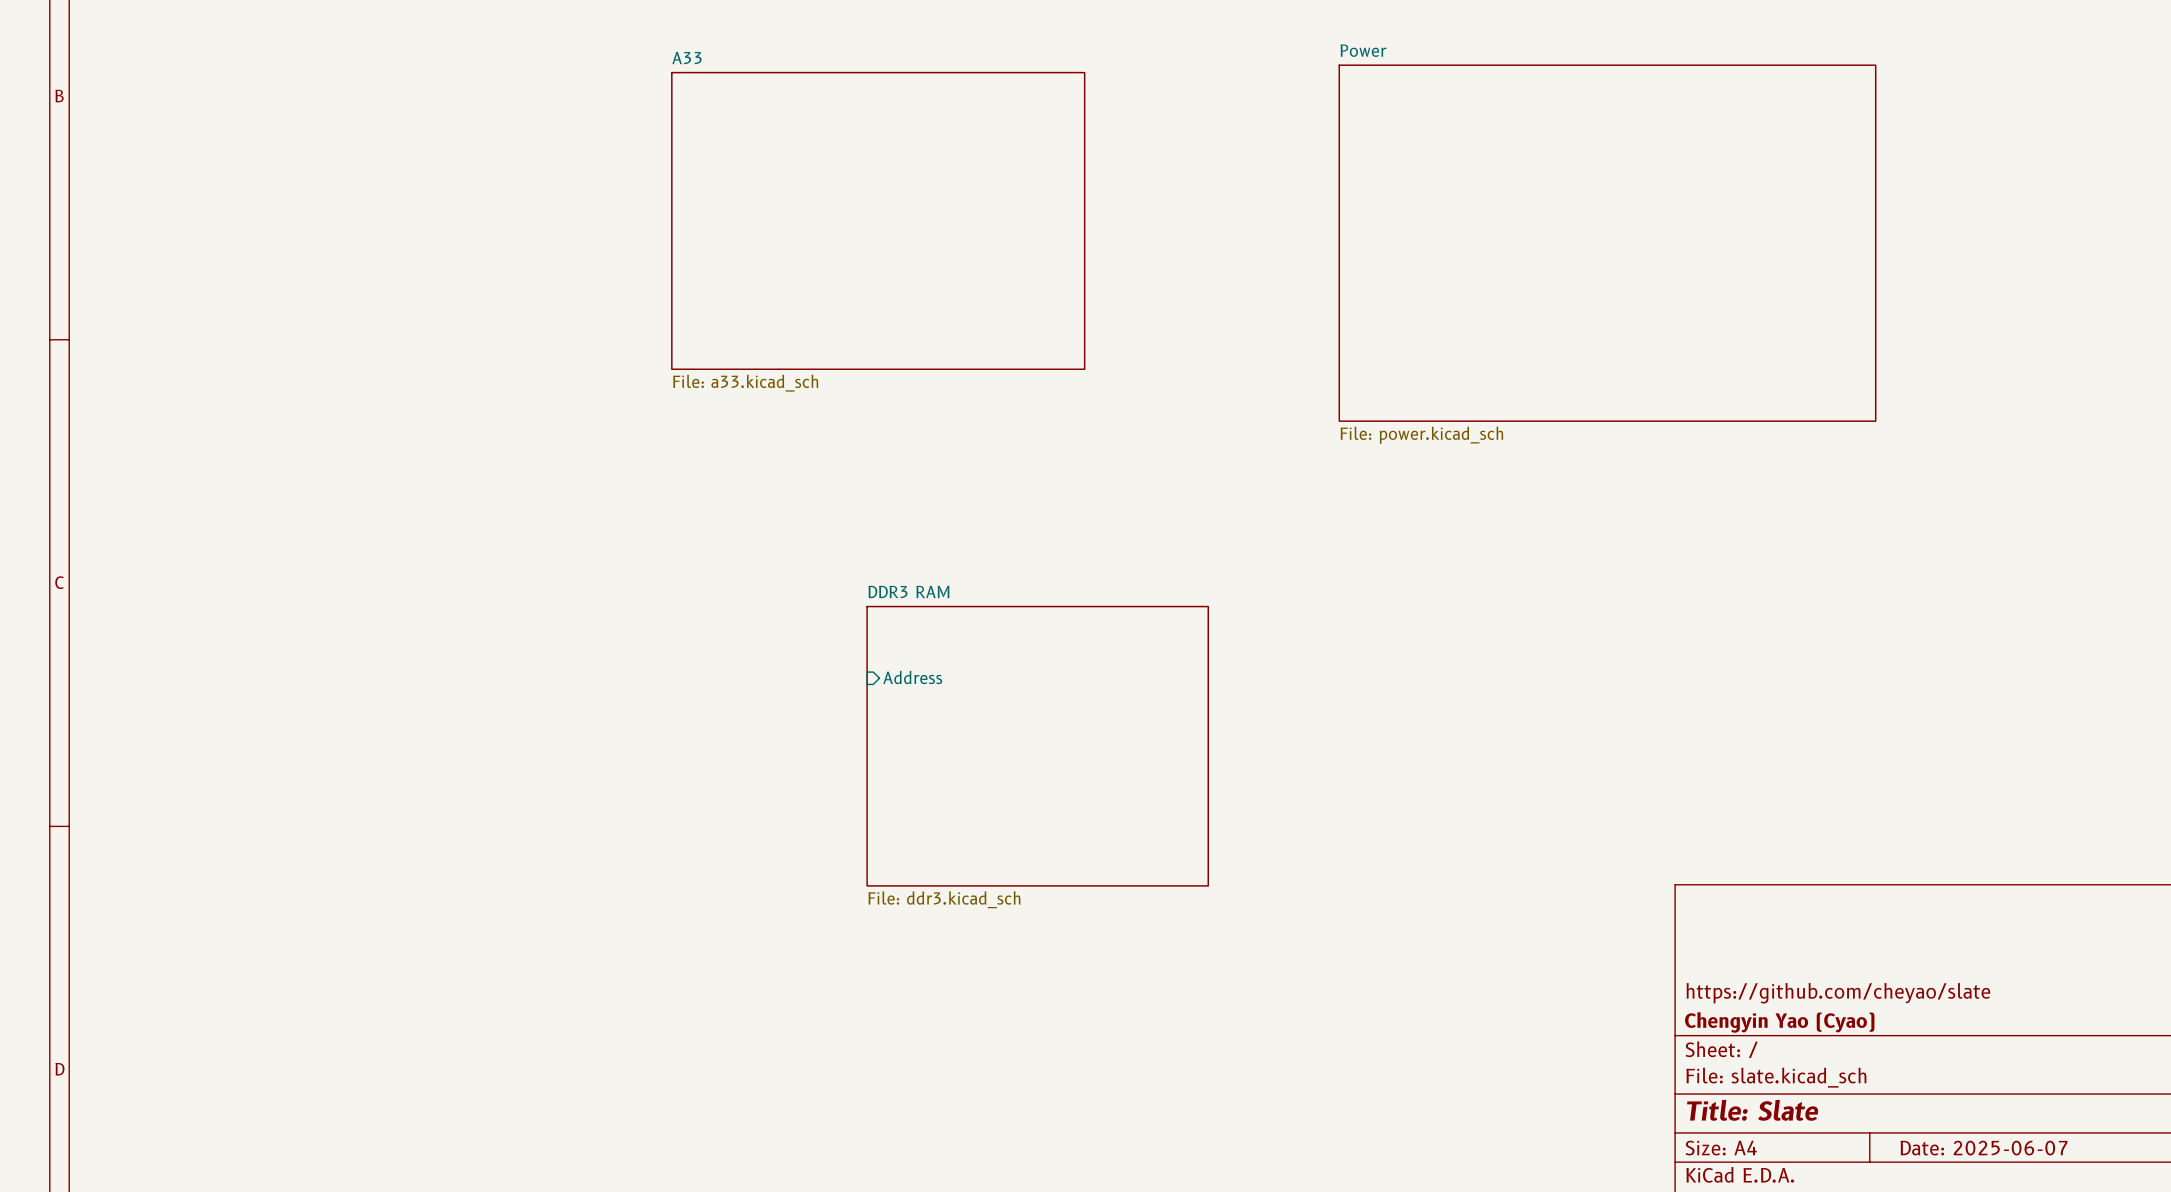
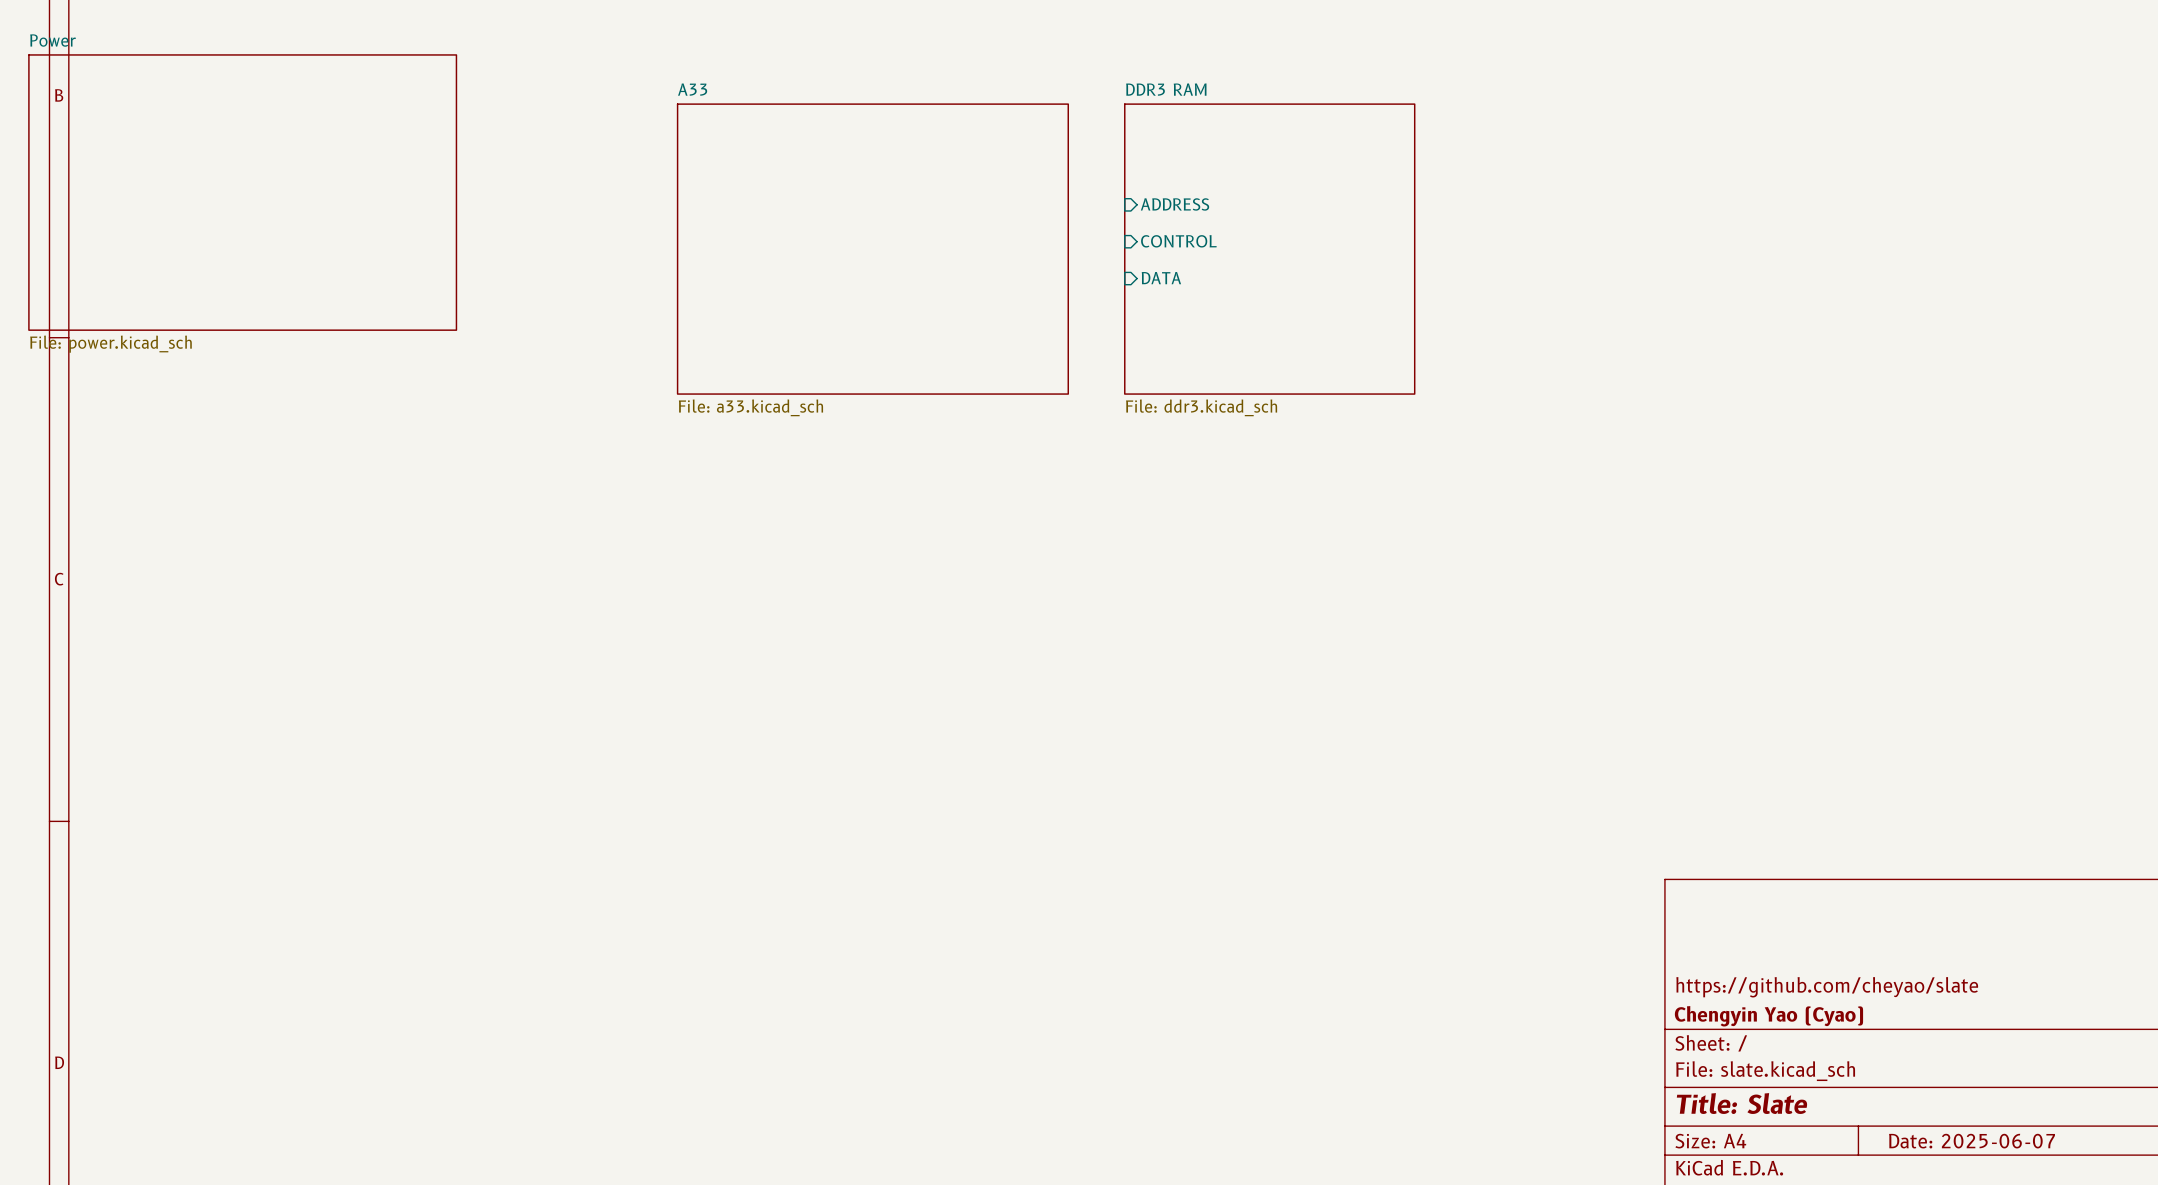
sheet A33 shape: [671, 71, 1086, 370] -> [676, 103, 1069, 395]
sheet Power: none -> File: power.kicad_sch (242, 192)
sheet pin: none -> ADDRESS (1175, 204)
sheet pin: none -> CONTROL (1178, 241)
sheet Power: File: power.kicad_sch (1607, 243) -> none
sheet pin: none -> DATA (1161, 278)
sheet DDR3 RAM name position: DDR3 RAM (908, 591) -> DDR3 RAM (1166, 89)
sheet DDR3 RAM shape: [866, 605, 1210, 887] -> [1124, 103, 1416, 395]
sheet pin: Address (912, 677) -> none
sheet DDR3 RAM value position: File: ddr3.kicad_sch (944, 899) -> File: ddr3.kicad_sch (1201, 407)

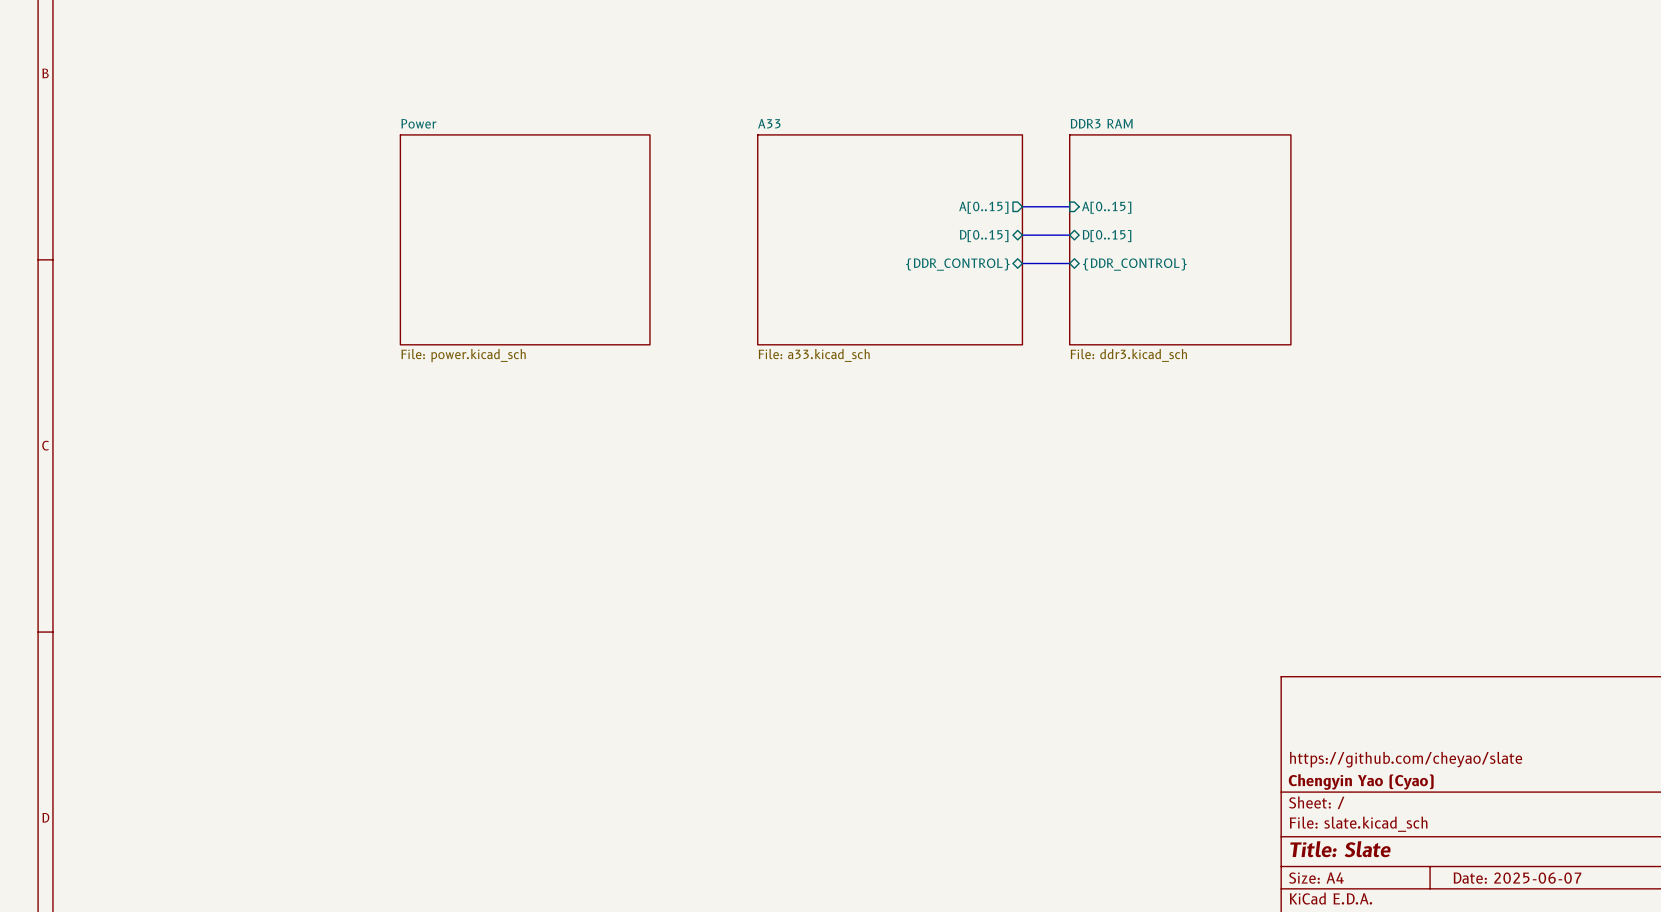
sheet A33 name position: A33 (692, 89) -> A33 (769, 123)
sheet A33 shape: [676, 103, 1069, 395] -> [757, 134, 1024, 346]
sheet DDR3 RAM shape: [1124, 103, 1416, 395] -> [1069, 134, 1292, 346]
sheet Power: File: power.kicad_sch (242, 192) -> none
sheet pin: ADDRESS (1175, 204) -> none
sheet pin: CONTROL (1178, 241) -> none
bus: none -> (1022, 206) (1069, 206)
sheet pin: none -> A[0..15] (983, 207)
sheet pin: none -> A[0..15] (1106, 207)
sheet pin: DATA (1161, 278) -> none
bus: none -> (1022, 235) (1069, 235)
sheet pin: none -> D[0..15] (984, 236)
sheet pin: none -> D[0..15] (1107, 236)
sheet Power: none -> File: power.kicad_sch (525, 239)
bus: none -> (1022, 263) (1069, 263)
sheet pin: none -> {DDR_CONTROL} (957, 264)
sheet pin: none -> {DDR_CONTROL} (1134, 264)
sheet A33 value position: File: a33.kicad_sch (750, 407) -> File: a33.kicad_sch (814, 355)

